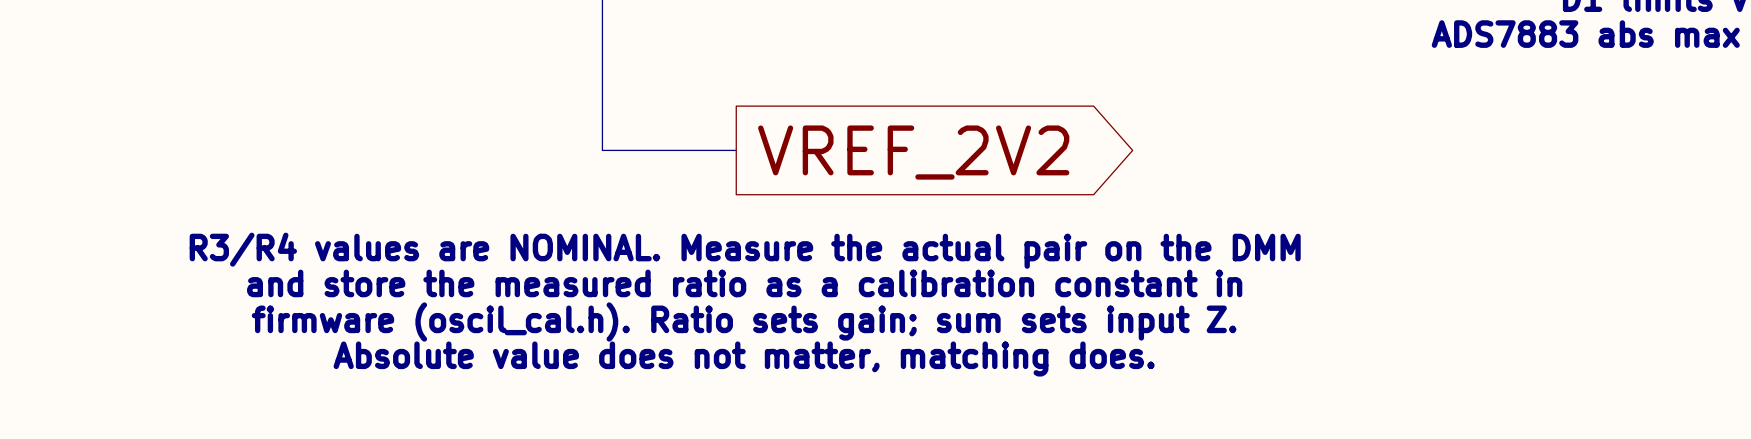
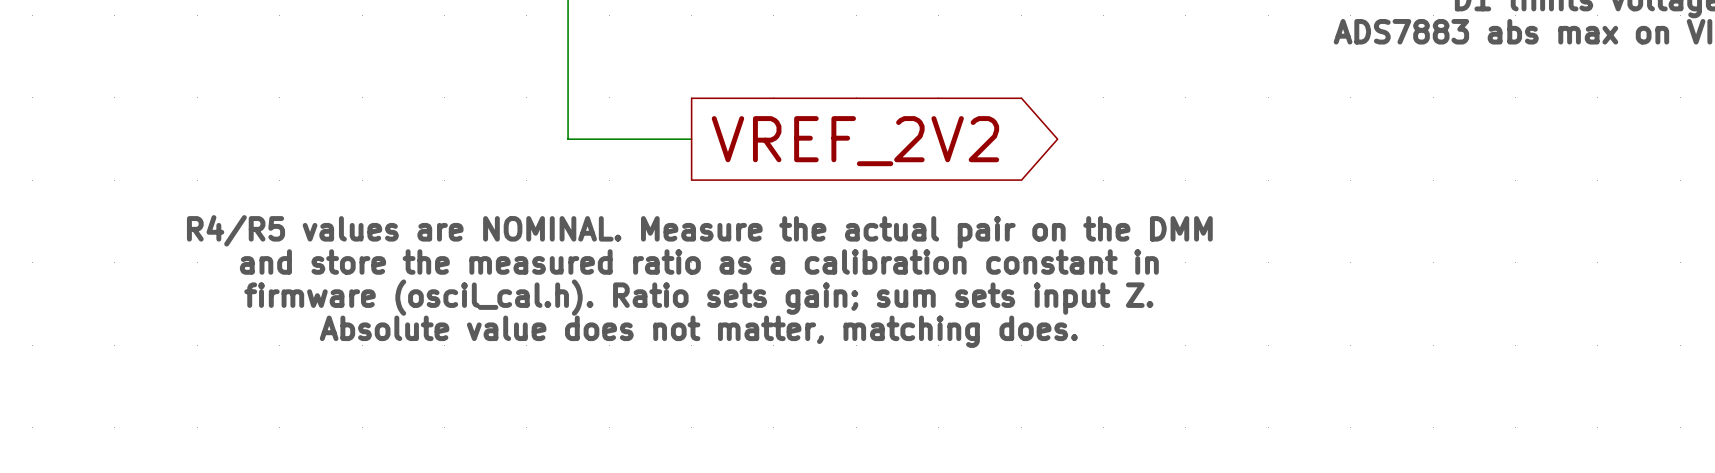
text: R3/R4 values are NOMINAL. Measure the actual pair on the DMM (745, 250) -> R4/R5 values are NOMINAL. Measure the actual pair on the DMM (699, 231)

